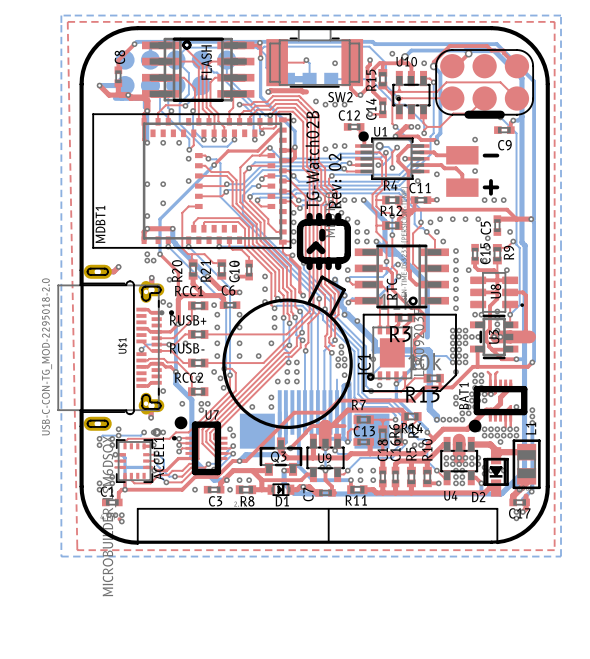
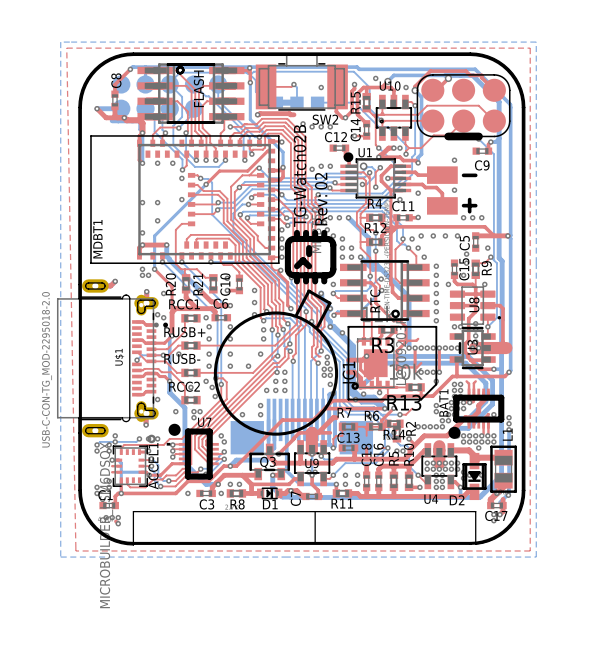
top track: none -> (418, 338) (416, 340) (398, 340)
top track: none -> (370, 340) (357, 341)
via: (452, 330) -> none
via: (459, 330) -> none
via: (465, 330) -> none
bottom track: (368, 335) (374, 341) (374, 350) (429, 351) (429, 409) (436, 416) (436, 419) -> (353, 346) (353, 390) (360, 397) (373, 397) (384, 408) (380, 408) (375, 403) (361, 403) (351, 393) (351, 357) (348, 354) (348, 341)
via: none -> (409, 348)
top track: none -> (415, 348) (415, 372)
via: none -> (415, 348)
via: none -> (421, 348)
via: none -> (427, 348)
top track: none -> (439, 348) (439, 372)
via: (452, 343) -> none
via: (459, 343) -> none
via: (465, 343) -> none
top track: none -> (366, 356) (362, 360) (348, 360)
bottom track: none -> (366, 356) (468, 356) (492, 380) (492, 404) (468, 428) (454, 428) (452, 430)
top track: none -> (360, 360) (360, 369) (368, 378) (372, 378)
via: (452, 349) -> none
via: (459, 349) -> none
top track: none -> (421, 363) (416, 367) (398, 367)
via: (452, 356) -> none
via: (459, 356) -> none
via: (465, 356) -> none
via position: (373, 359) -> (366, 356)
bottom track: (417, 362) (396, 383) (396, 398) (427, 429) (427, 432) -> none
via: none -> (421, 372)
via: none -> (427, 372)
bottom track: (452, 362) (446, 356) (391, 356) (371, 375) -> none
via: (465, 362) -> none
top track: none -> (377, 378) (377, 387)
bottom track: none -> (360, 387) (384, 363) (465, 363) (485, 383) (485, 401) (469, 418) (461, 418) (458, 421)
top track: (414, 378) (401, 391) (371, 391) -> (396, 387) (360, 387) (360, 378) (354, 372) (348, 372)
top track: (425, 387) (412, 400) (401, 400) -> (407, 396) (386, 396) (381, 400) (332, 400) (324, 408)
via: none -> (384, 408)
top track: none -> (393, 408) (381, 420) (381, 426)
via: none -> (393, 408)
top track: none -> (412, 408) (406, 414) (399, 414)
bottom track: none -> (380, 414) (399, 414)
via: none -> (399, 414)
via: none -> (369, 416)
top track: (350, 410) (401, 410) (405, 413) (405, 422) (398, 429) -> none
via: (395, 419) -> none
R6 rotation: 0° (382, 435) -> 90° clockwise (375, 426)
R6 position: (382, 435) -> (375, 426)
R2 position: (398, 435) -> (396, 432)

